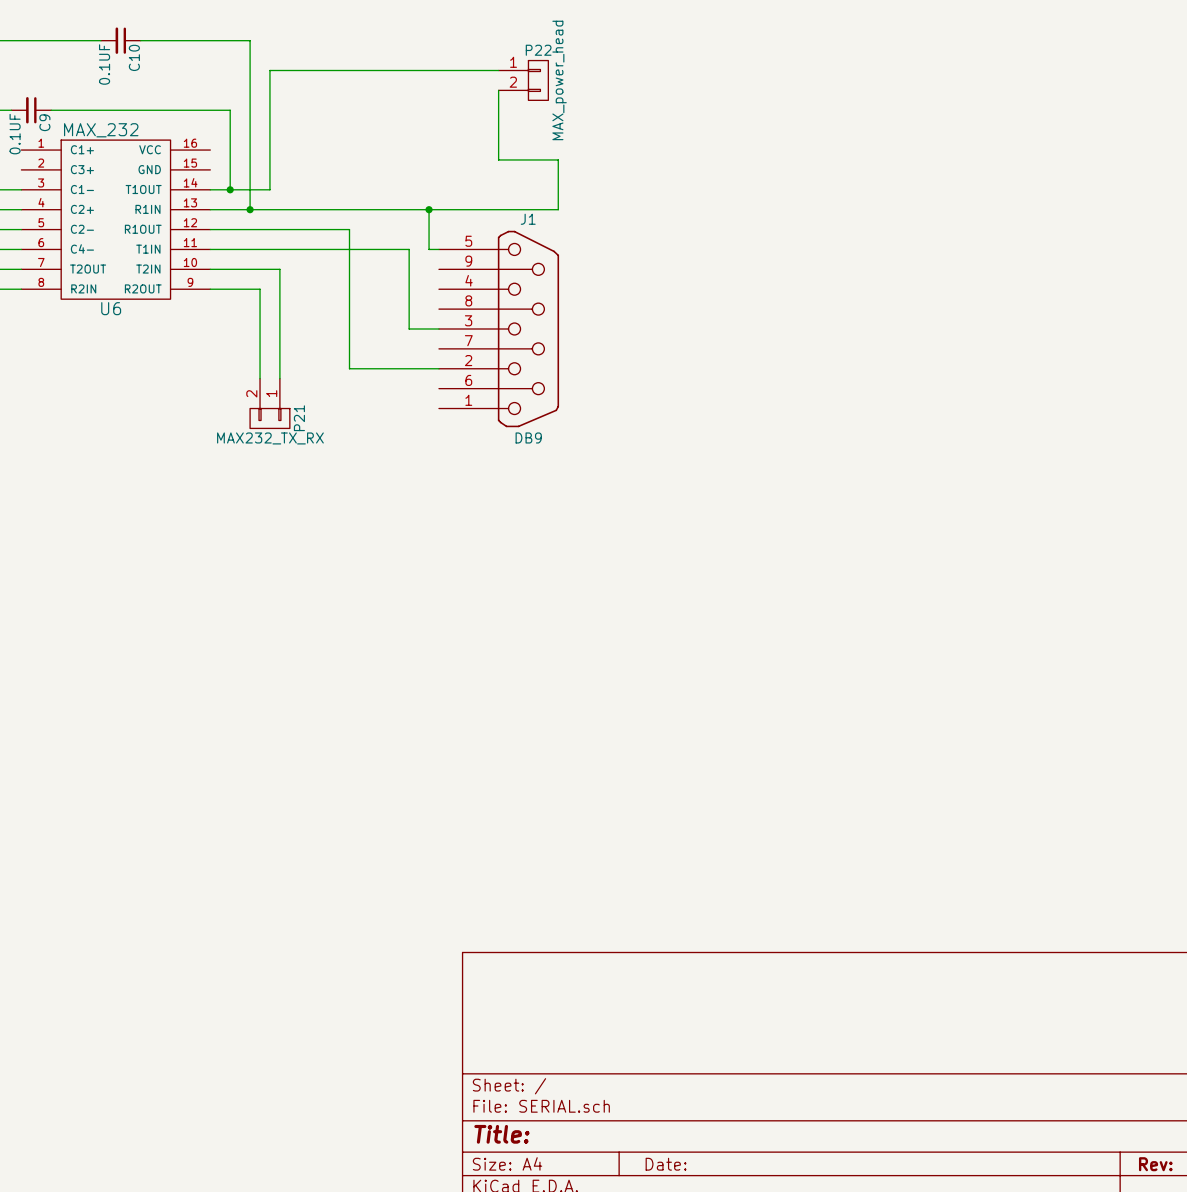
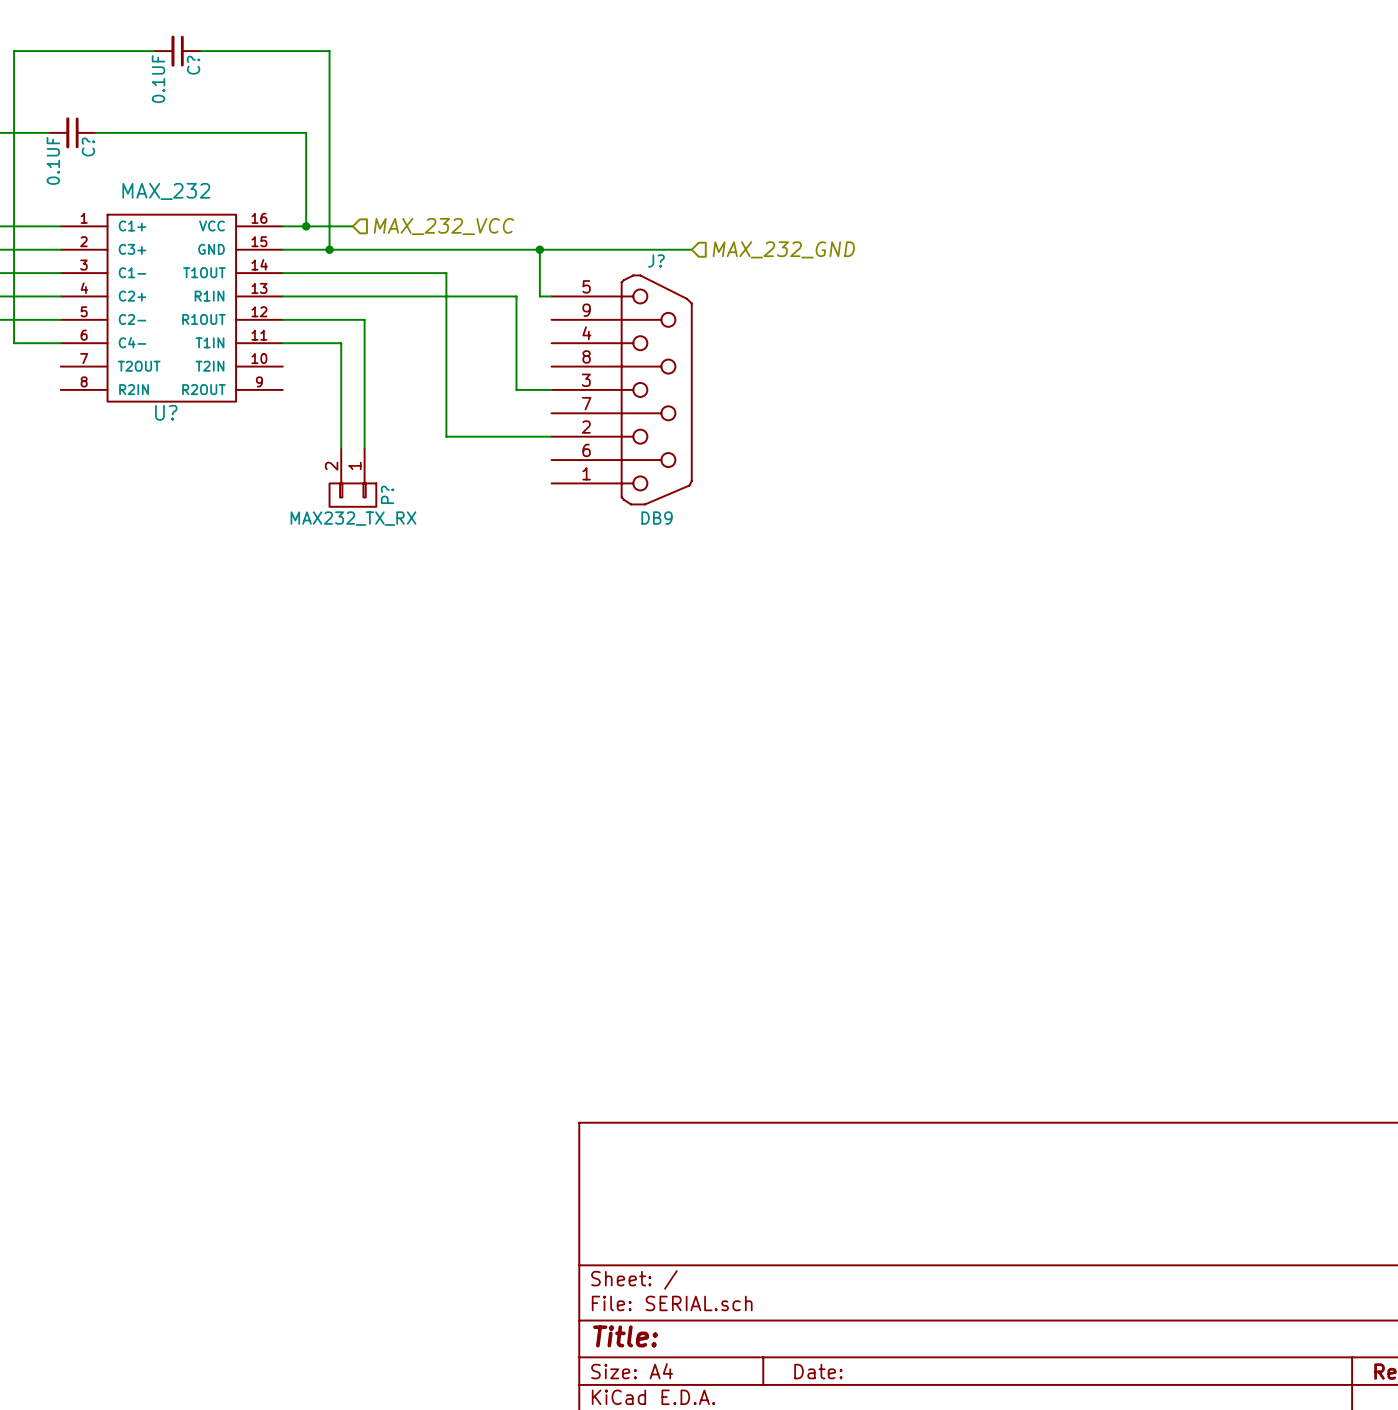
C10 name: C10 (134, 57) -> C? (193, 65)
wire: (498, 70) (269, 70) (269, 189) -> none
P22: MAX_power_head (523, 80) -> none
wire: (498, 90) (498, 159) (558, 159) (558, 209) -> none
C9 name: C9 (44, 122) -> C? (88, 146)
hierarchical label: none -> MAX_232_VCC (443, 226)
hierarchical label: none -> MAX_232_GND (783, 249)
U6: MAX_232 (115, 219) -> none
J1 name: J1 (528, 219) -> J? (656, 260)
U?: none -> MAX_232 (171, 308)
P21 name: P21 (299, 418) -> P? (387, 494)

